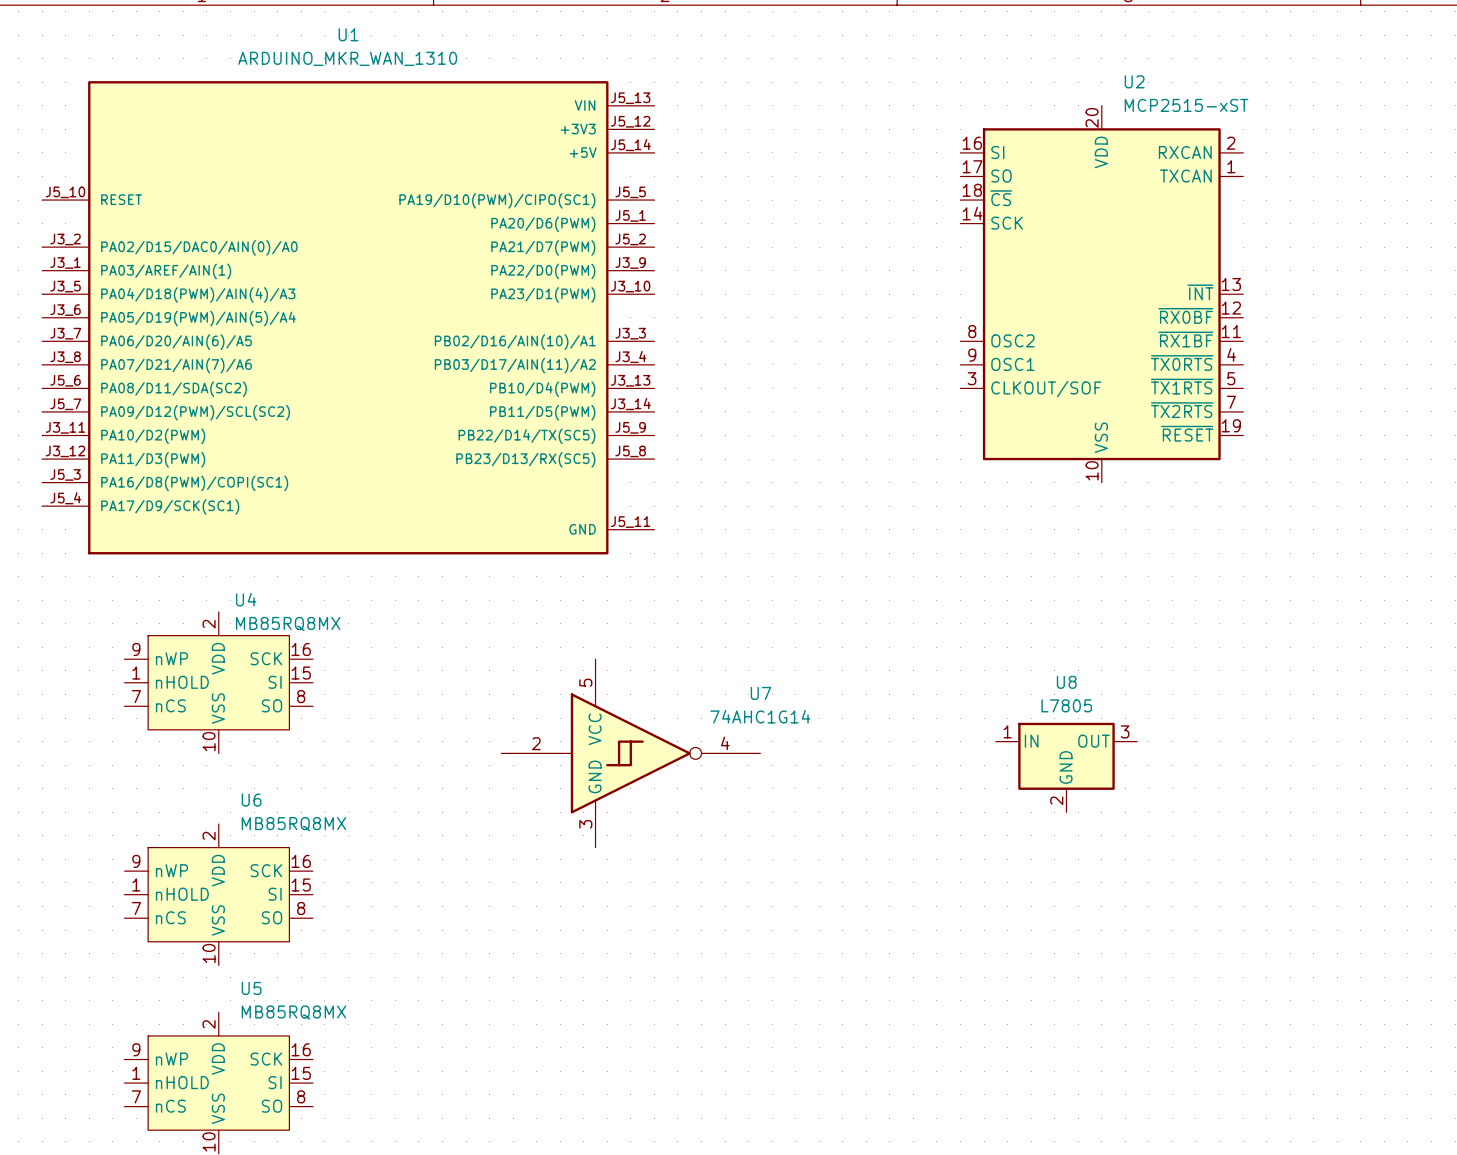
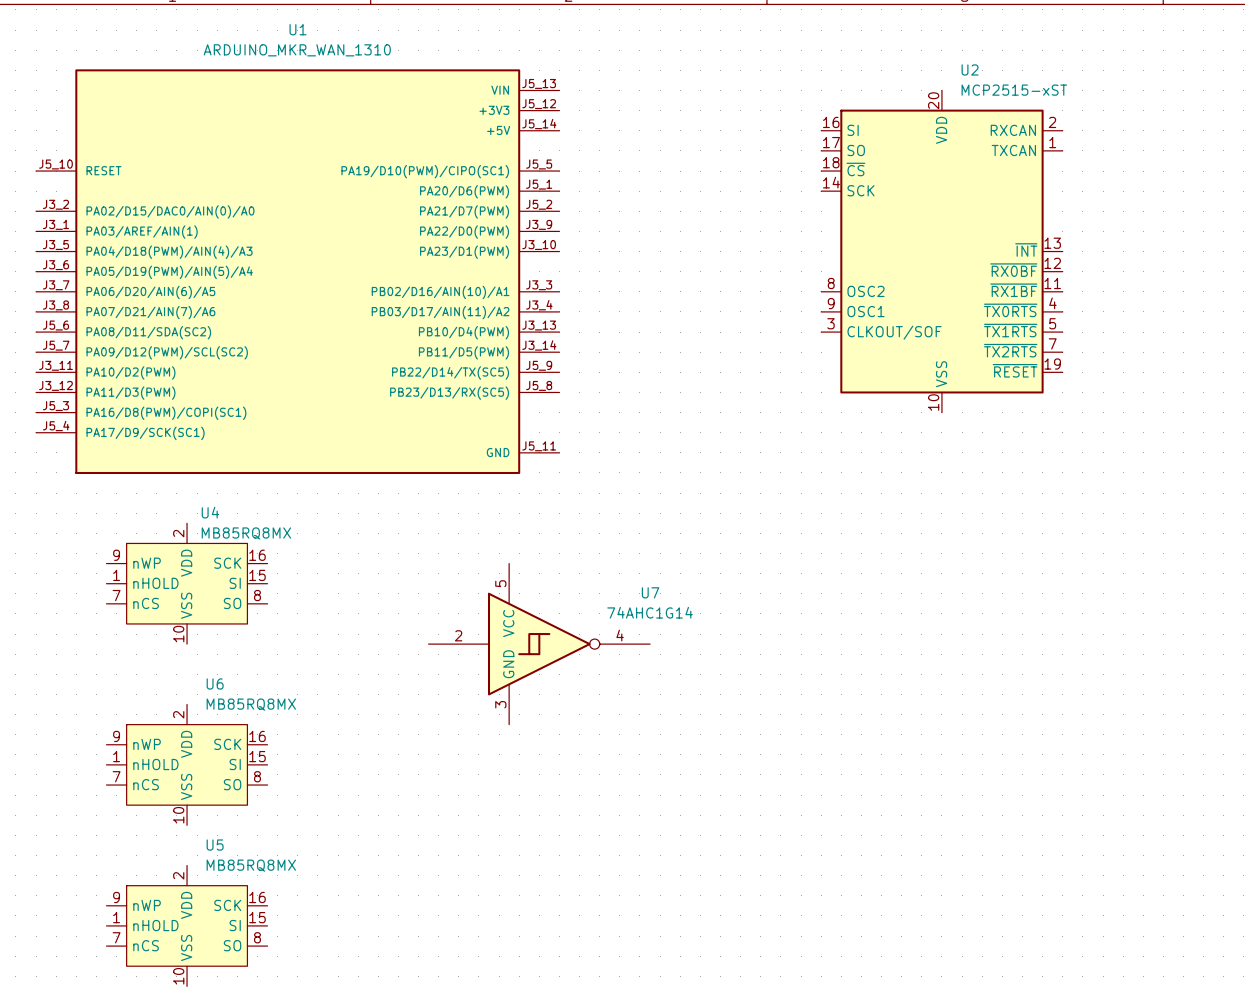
U8: L7805 (1066, 767) -> none

